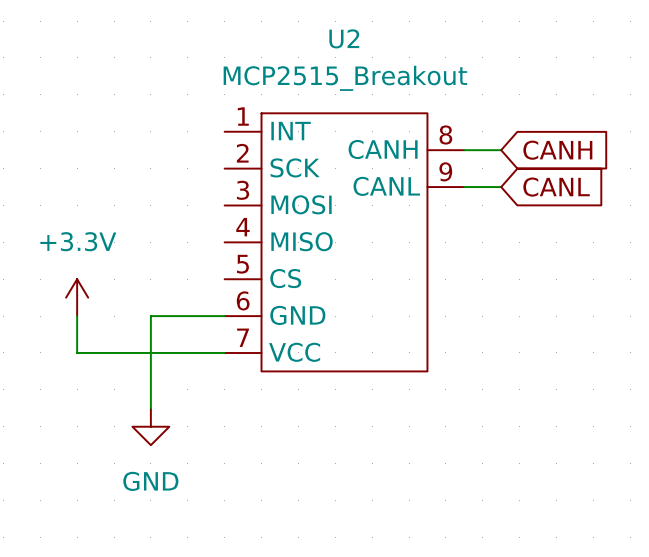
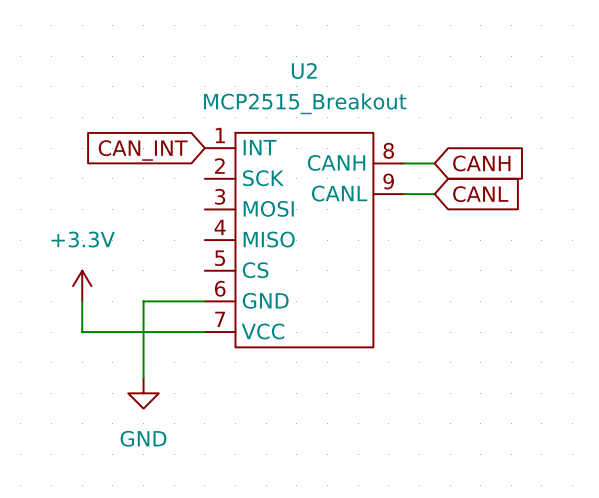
global label: none -> CAN_INT (143, 150)

